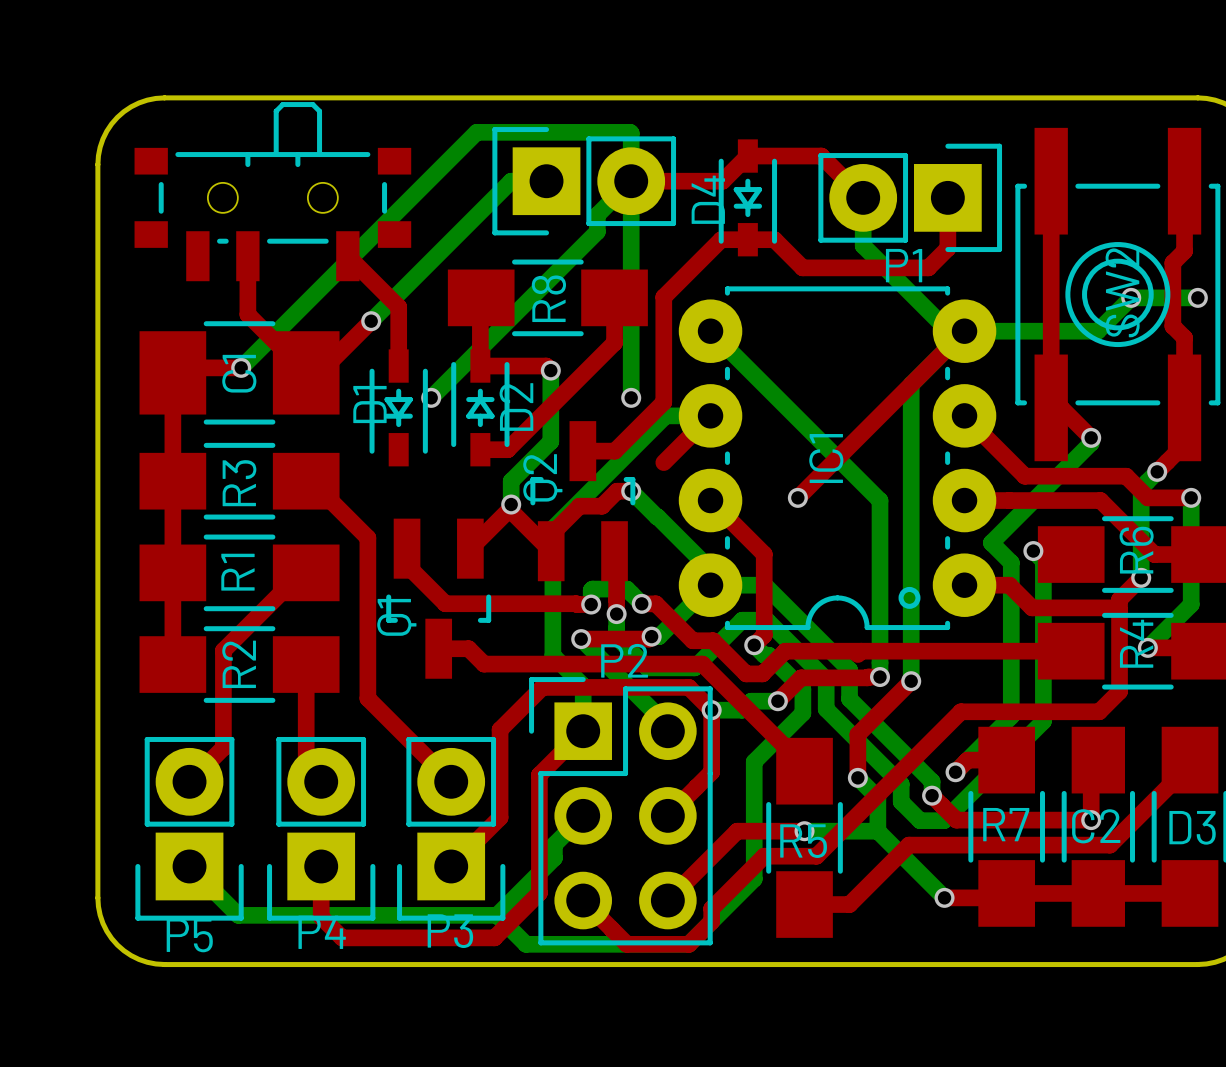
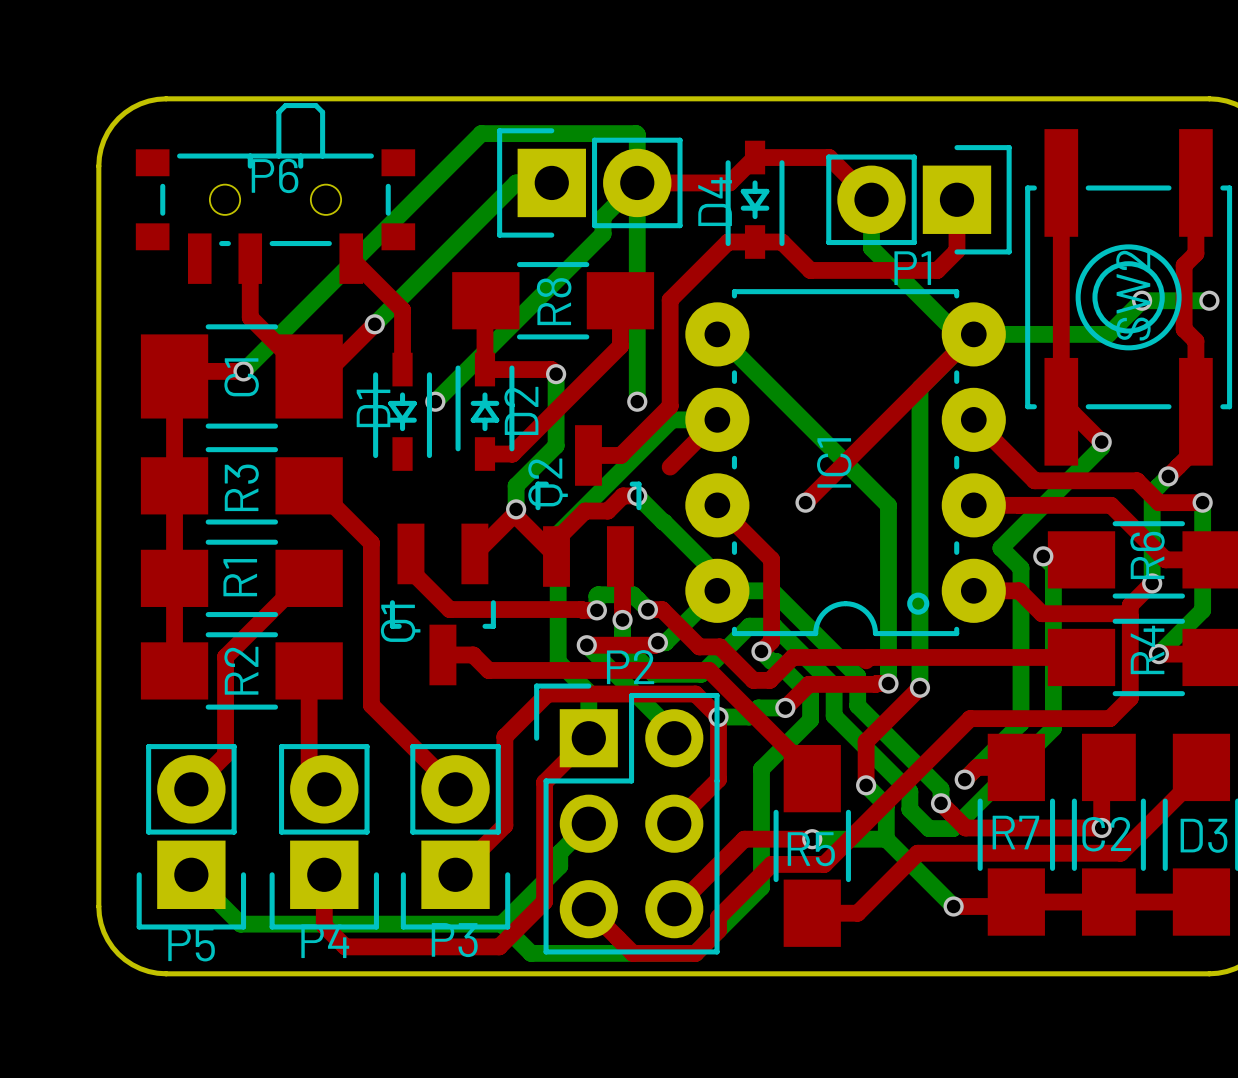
P6 name: none -> P6 (275, 175)

